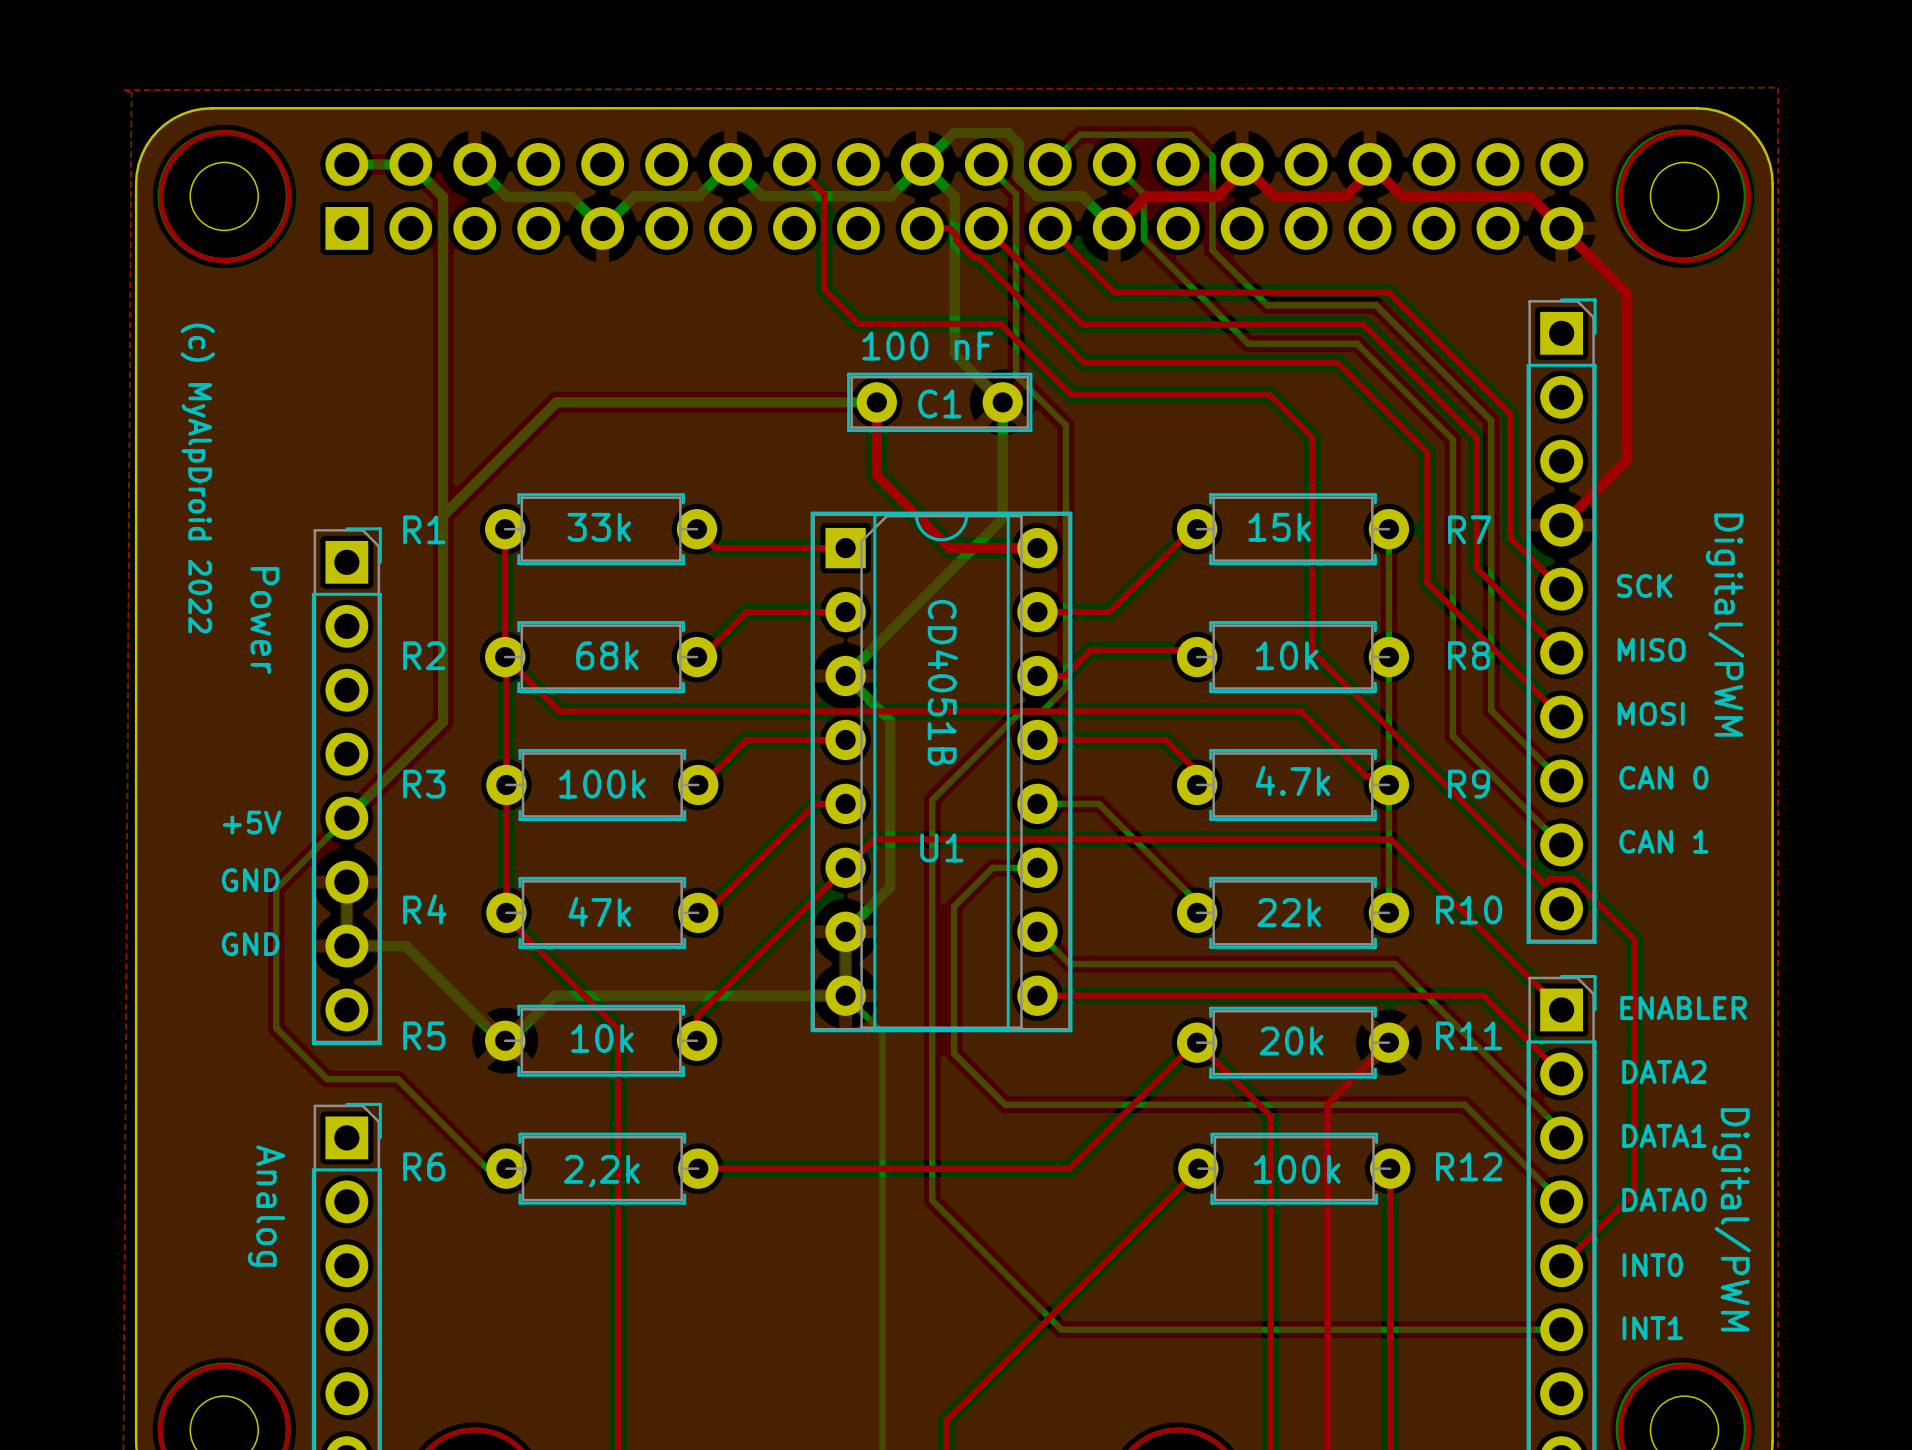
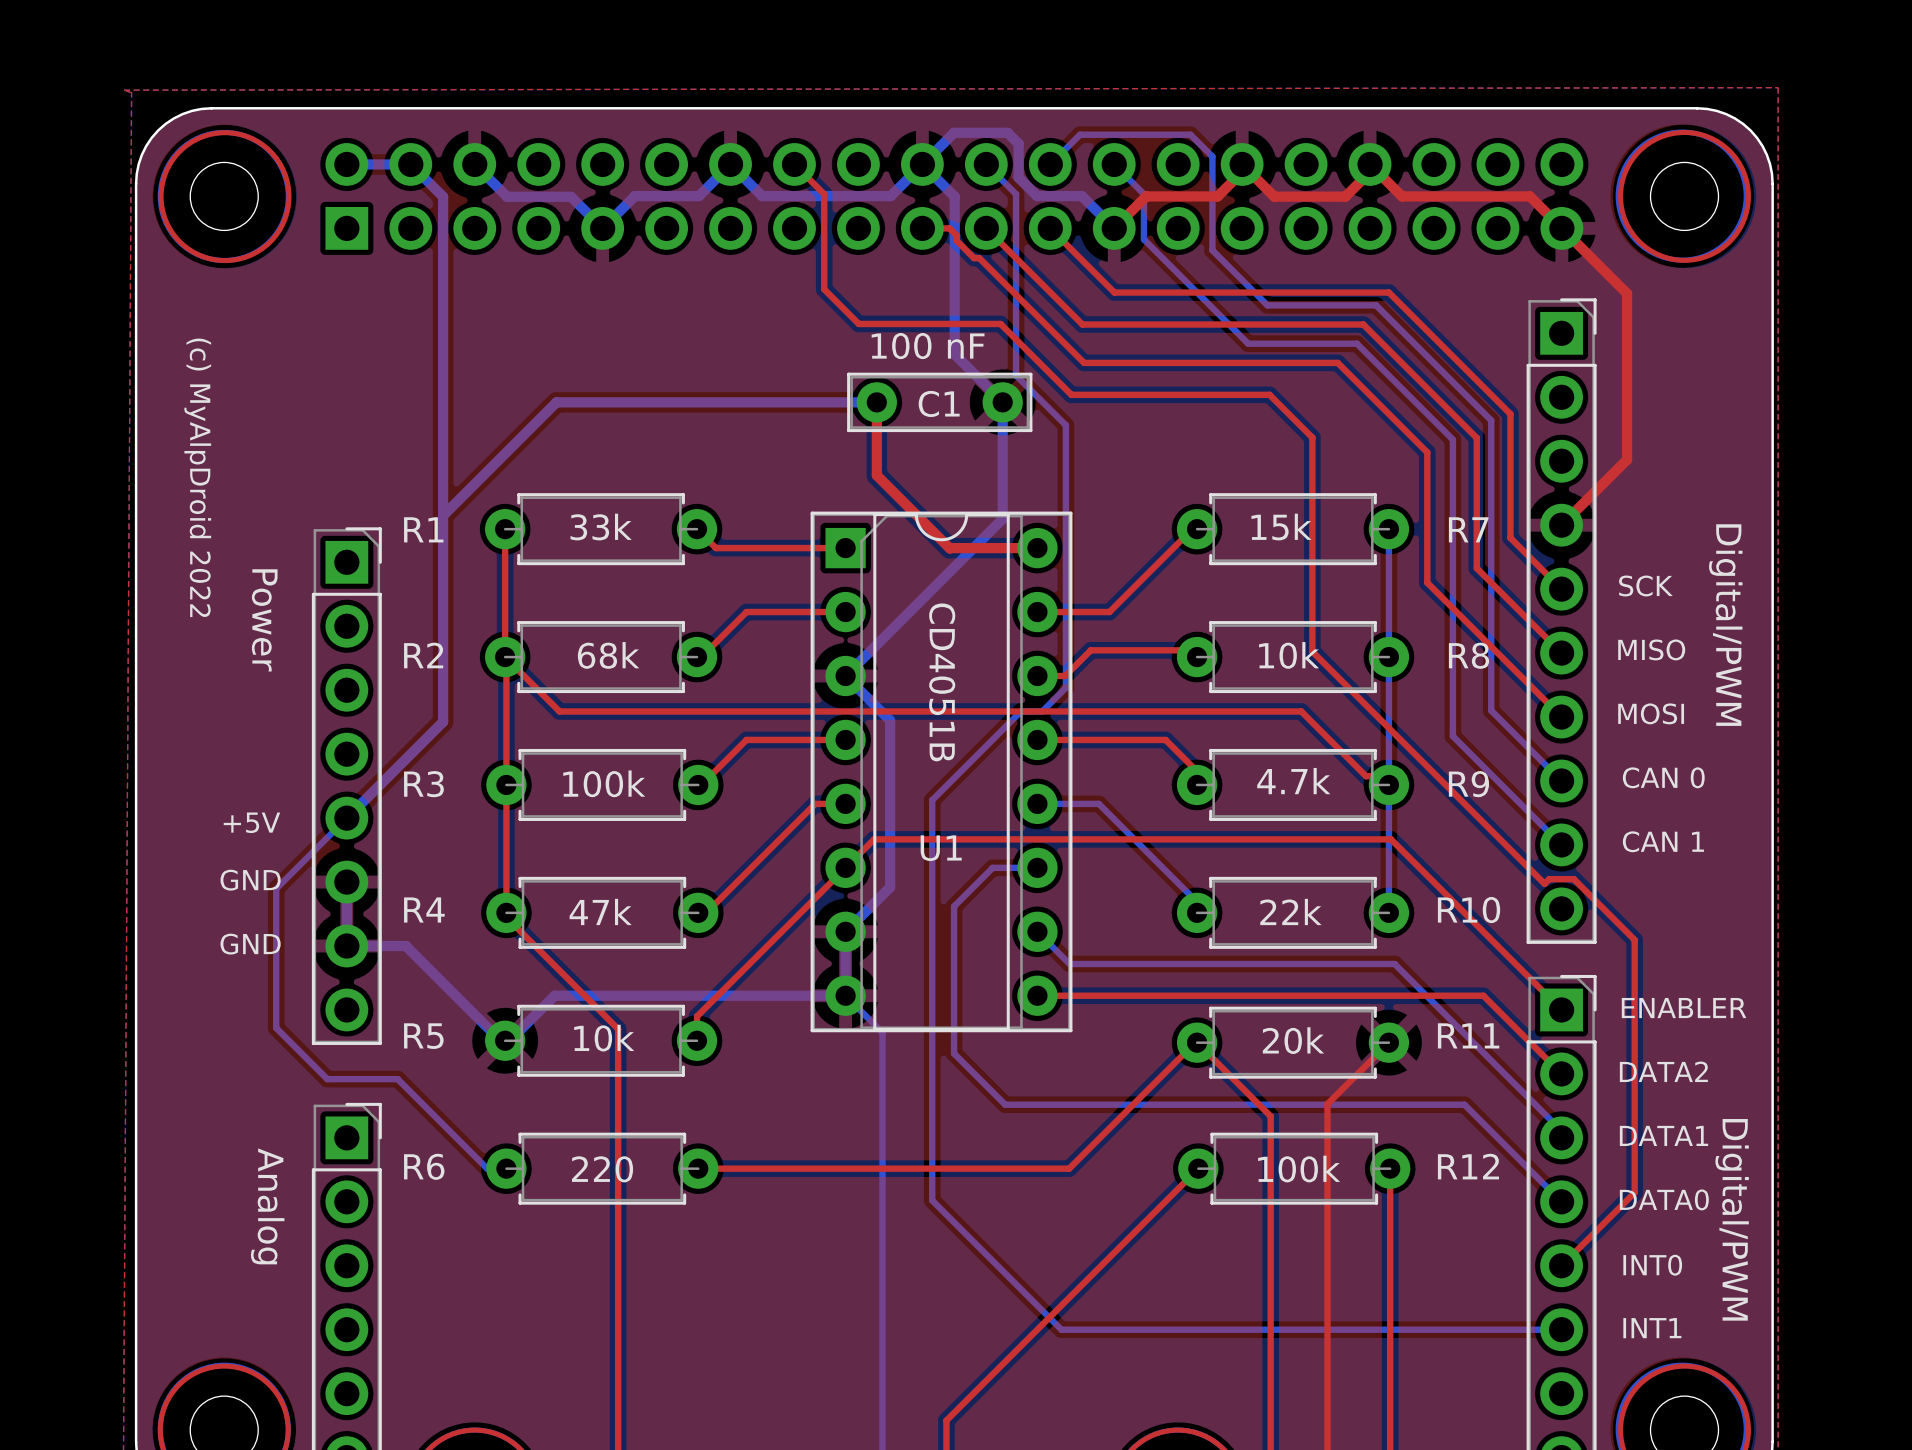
text: 2,2k (601, 1171) -> 220 (602, 1169)

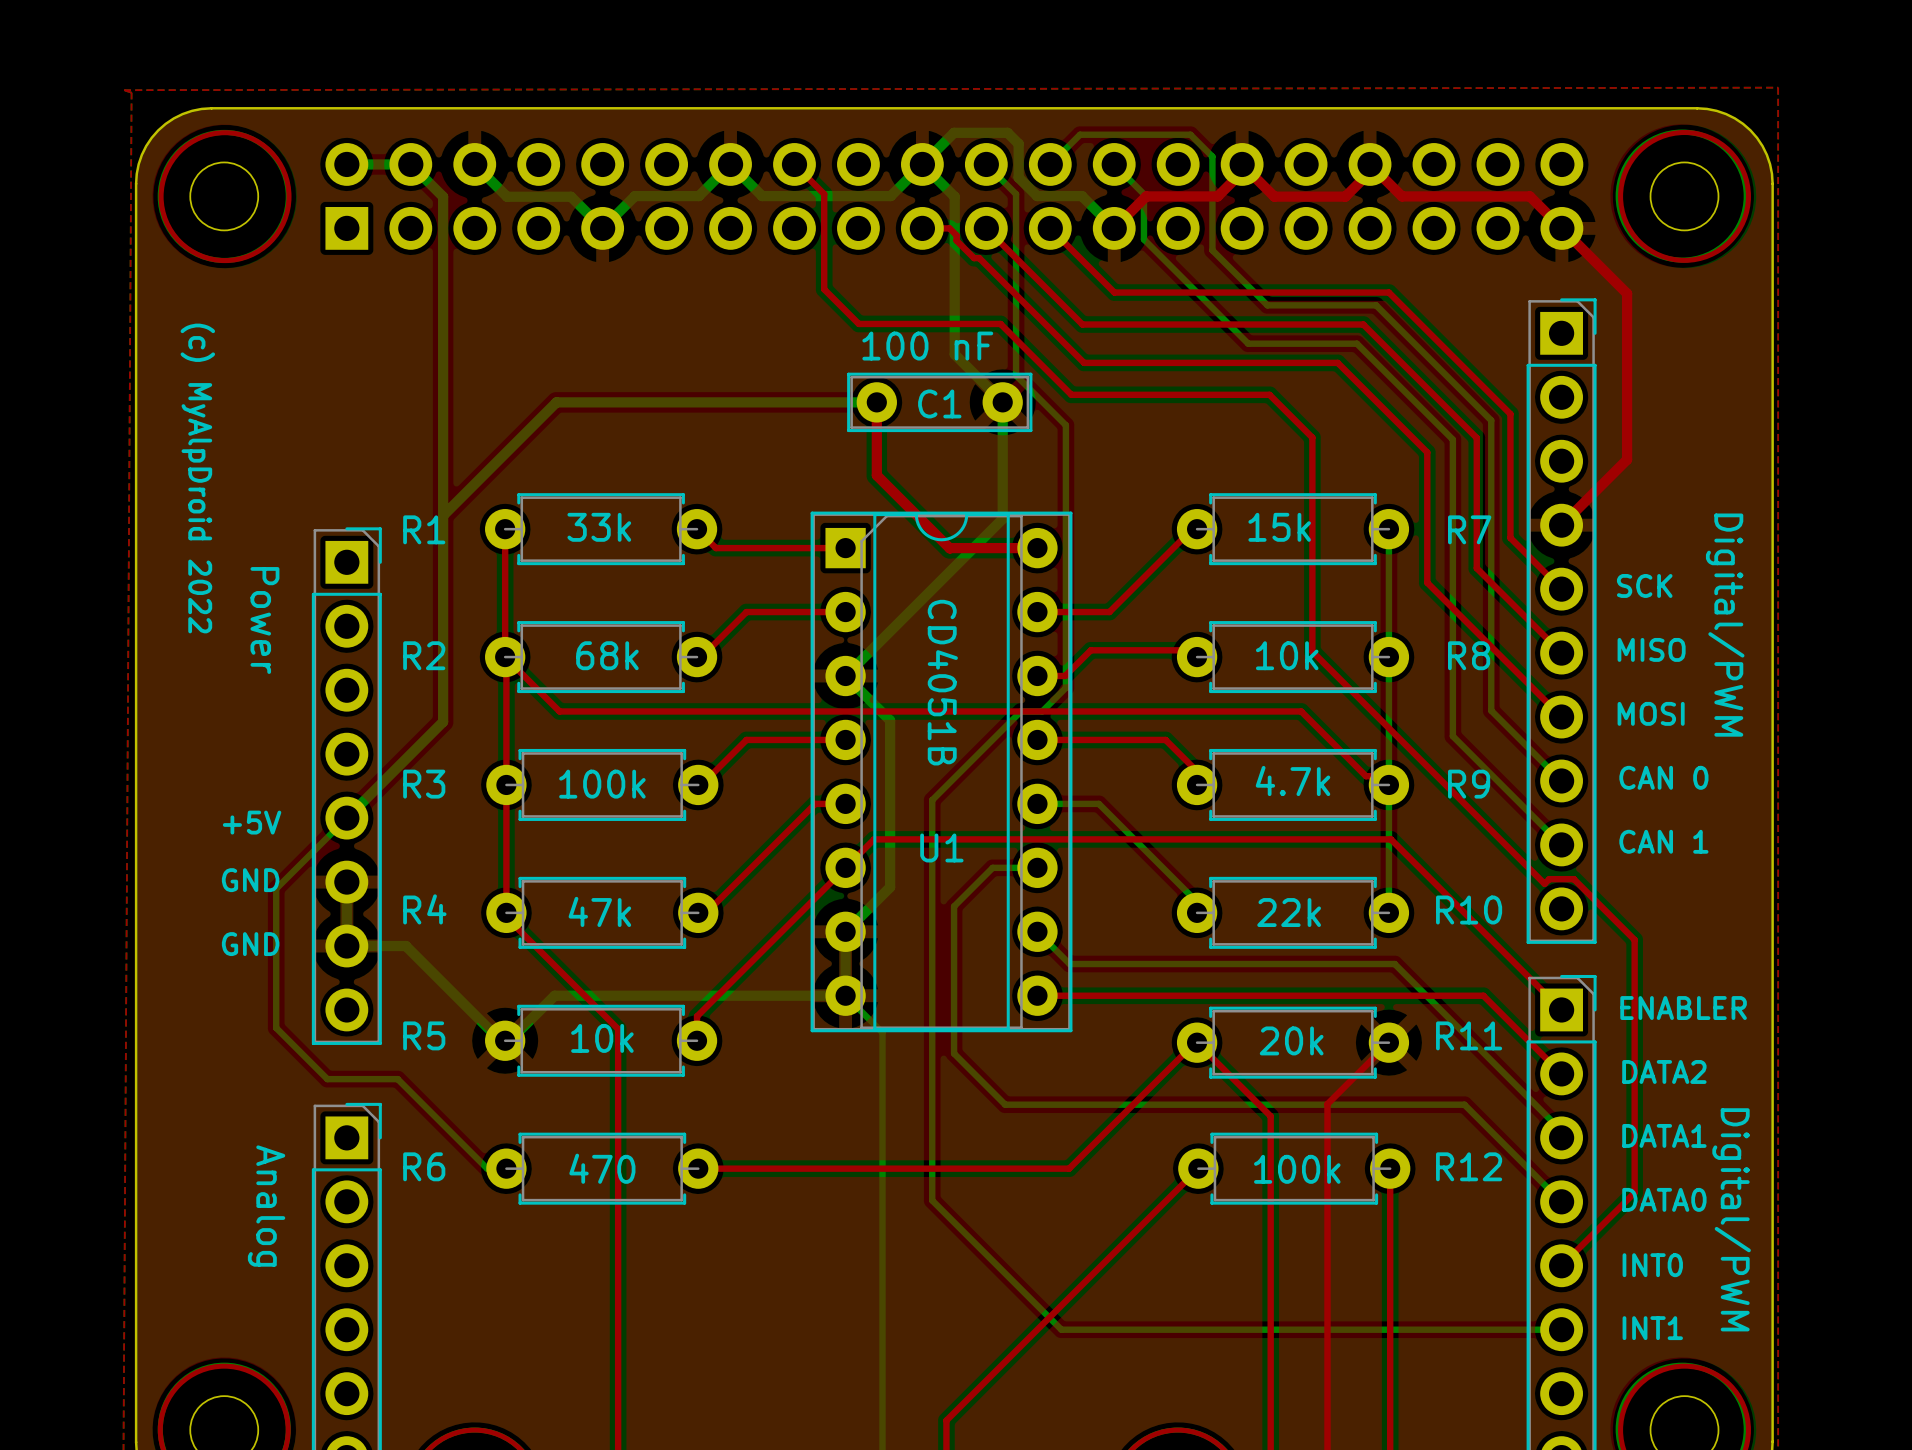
text: 220 (602, 1169) -> 470 (602, 1168)

